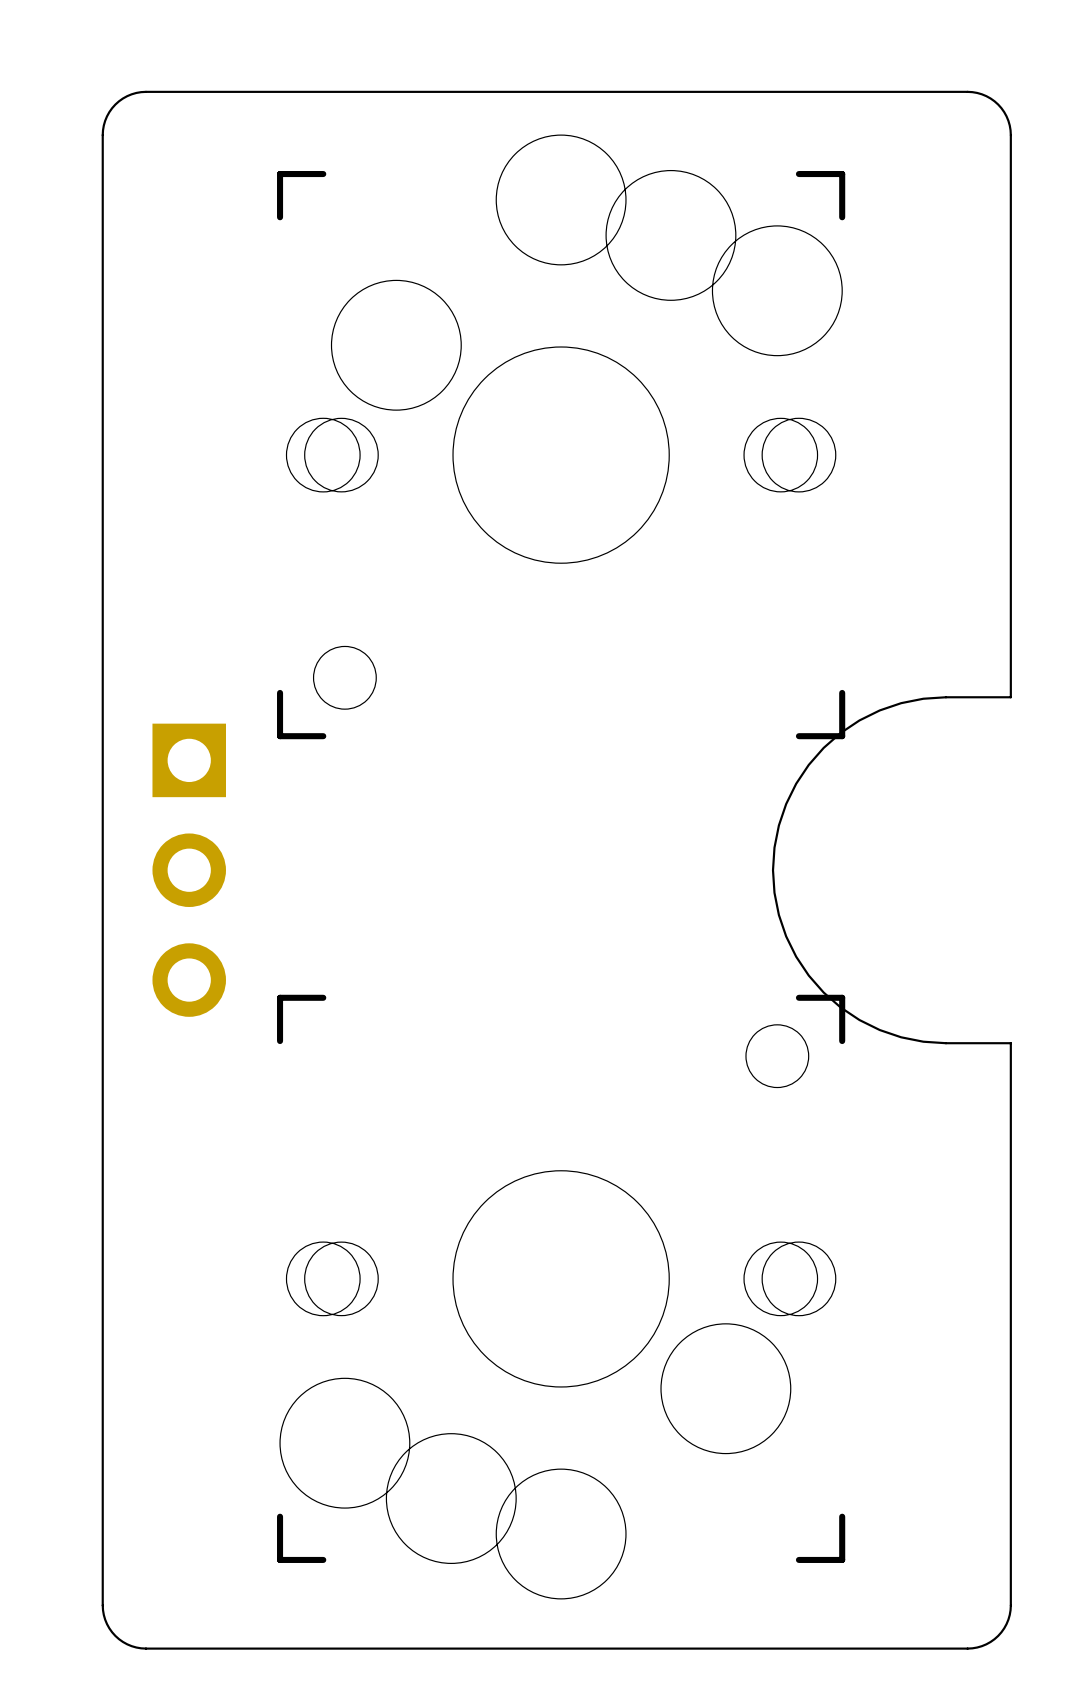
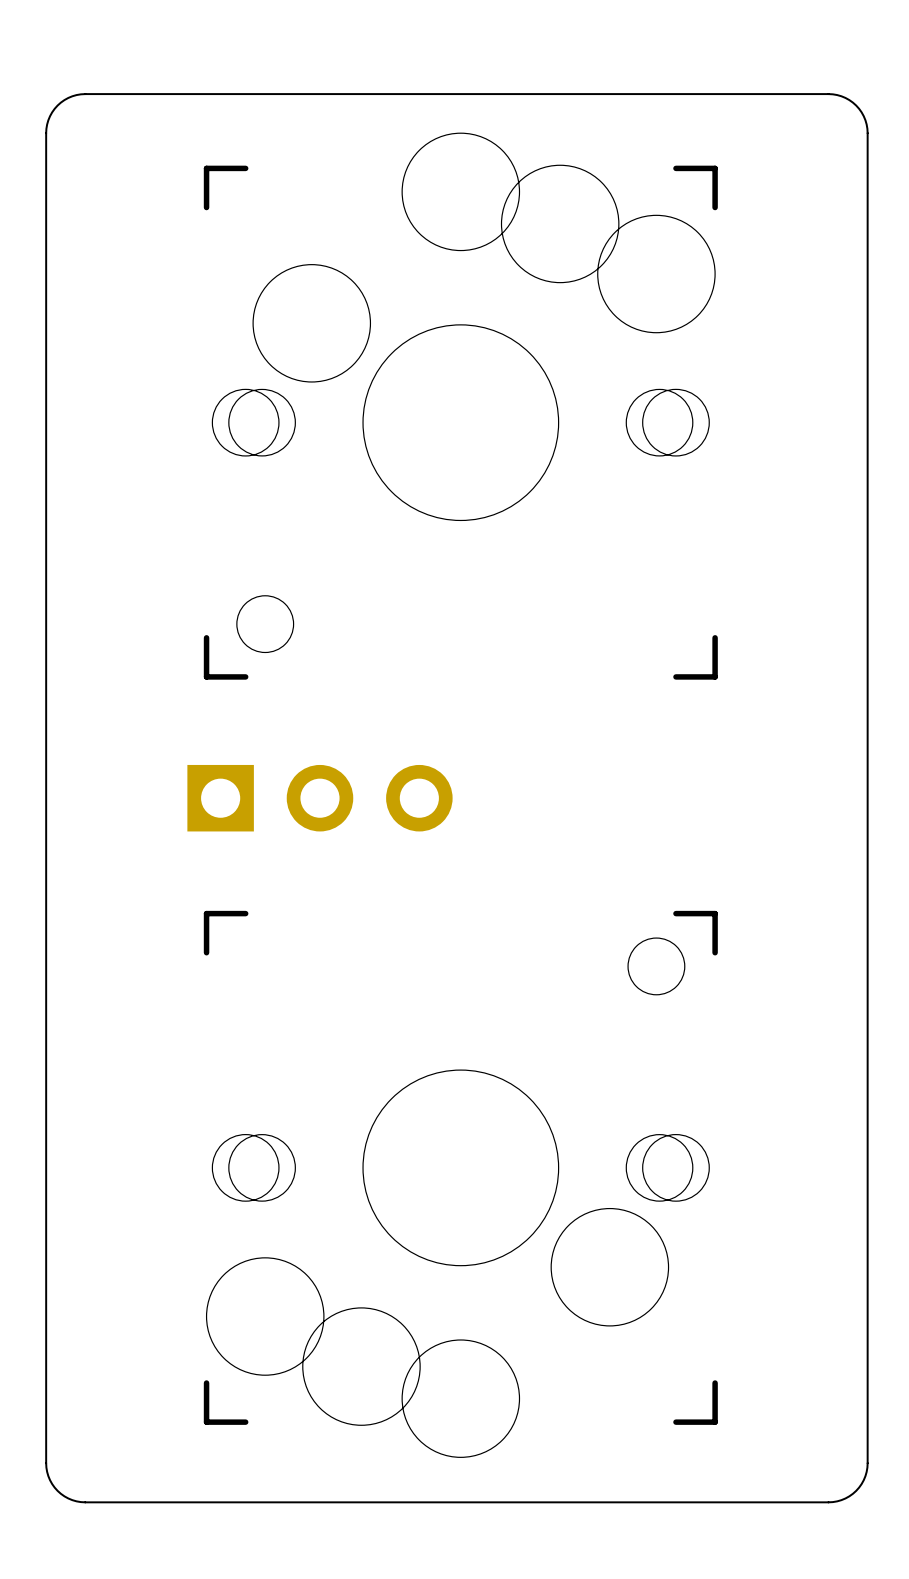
board edge: (1010, 697) (945, 697) (901, 703) (879, 710) (840, 733) (808, 764) (796, 783) (778, 825) (773, 870) (778, 915) (796, 956) (808, 975) (840, 1007) (879, 1030) (901, 1037) (945, 1043) (1010, 1043) -> (867, 641) (867, 954)
part rotation: 0° (189, 870) -> 90° counterclockwise (319, 798)
part position: (189, 870) -> (319, 798)

